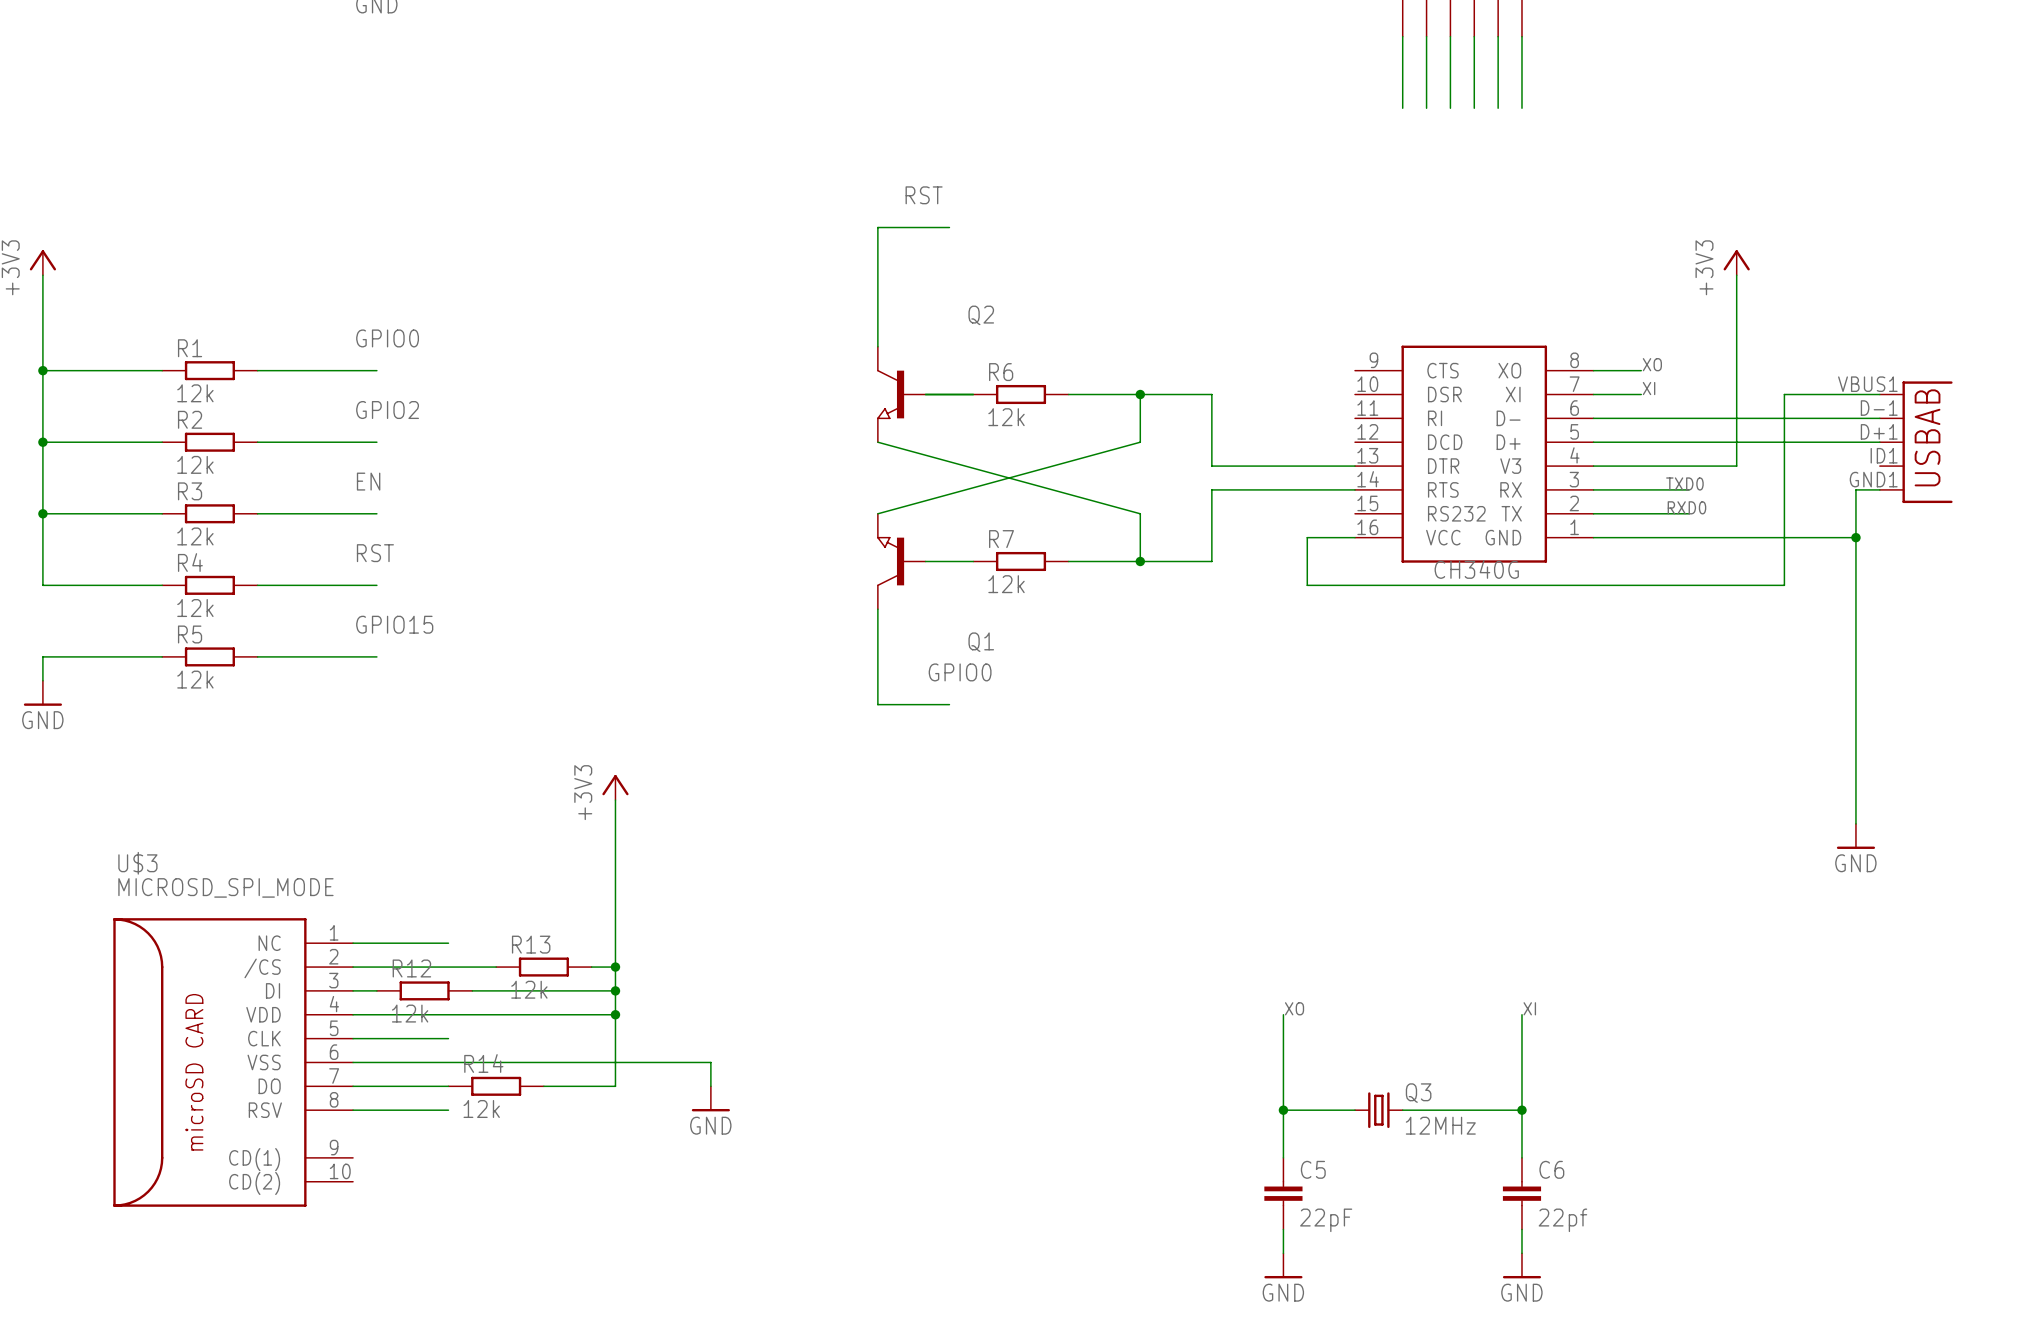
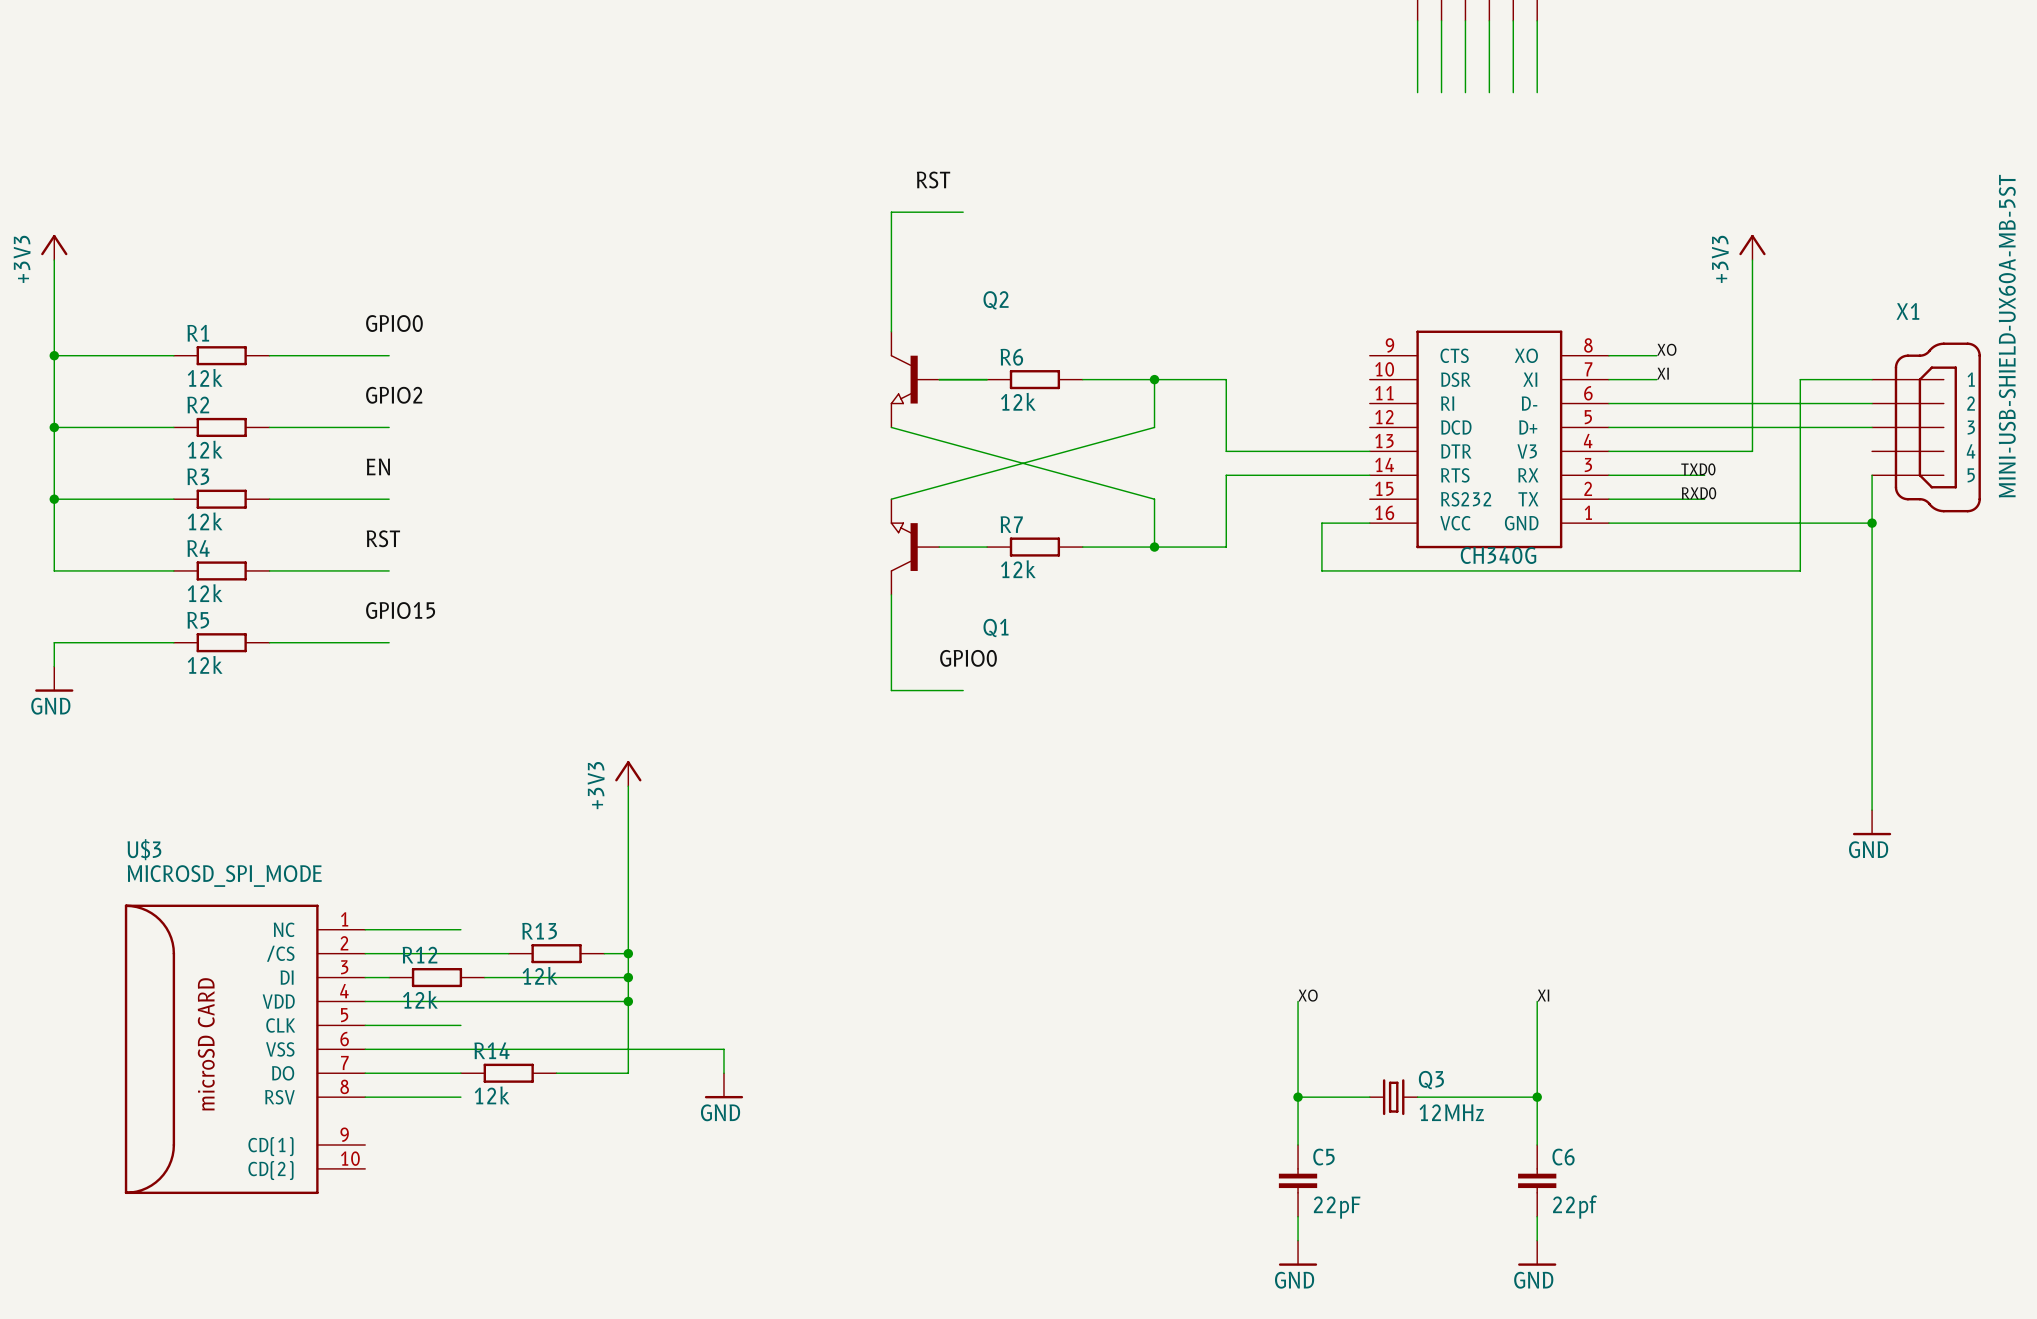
X1: none -> MINI-USB-SHIELD-UX60A-MB-5ST (1926, 427)
part: (1916, 442) -> none

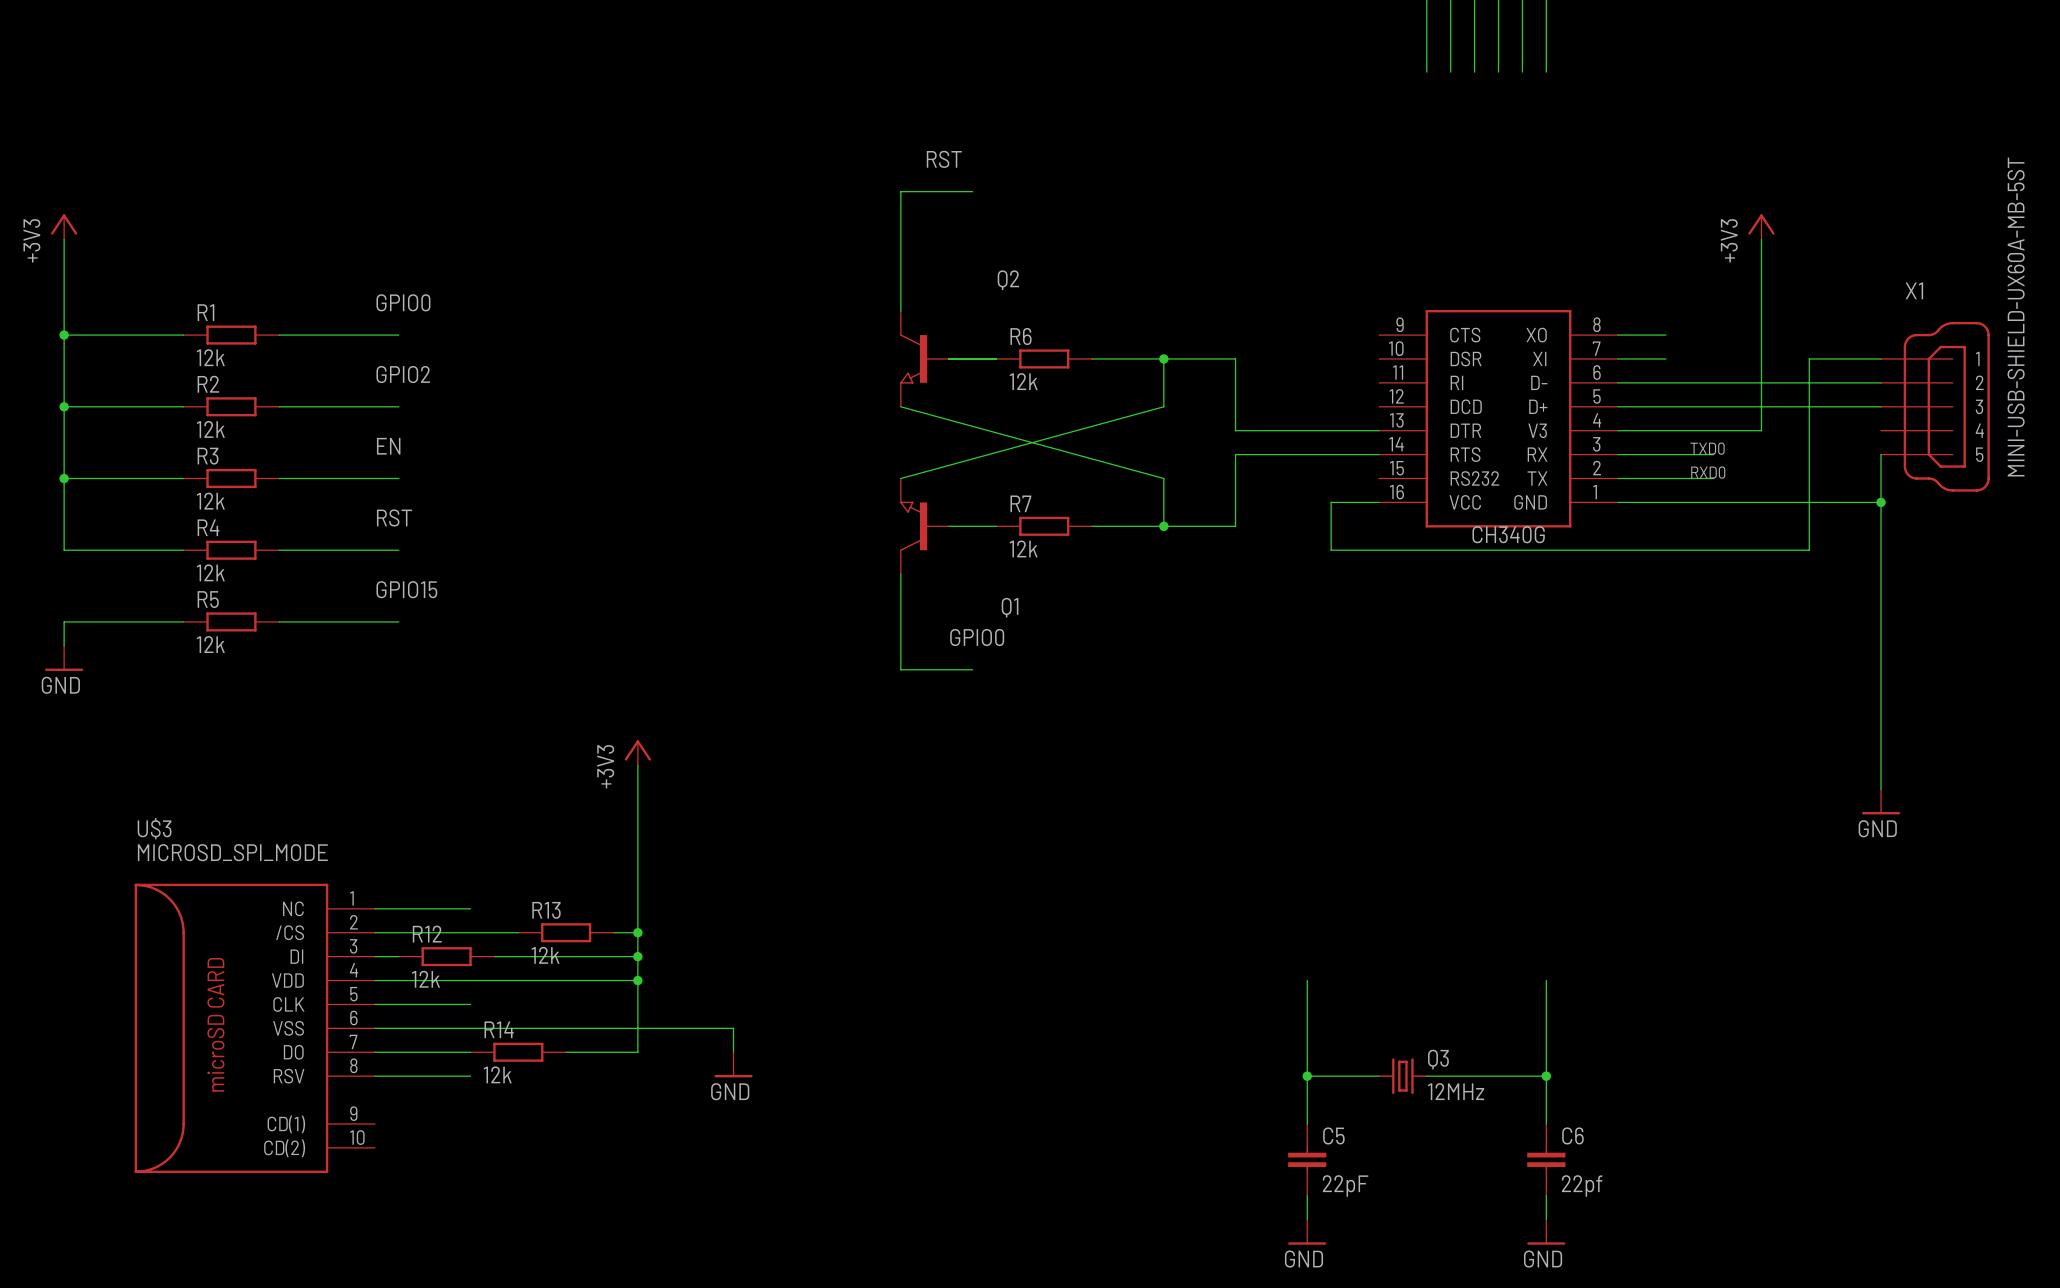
label: XO (1666, 349) -> none
label: XI (1663, 373) -> none
label: XO (1308, 995) -> none
label: XI (1543, 995) -> none

